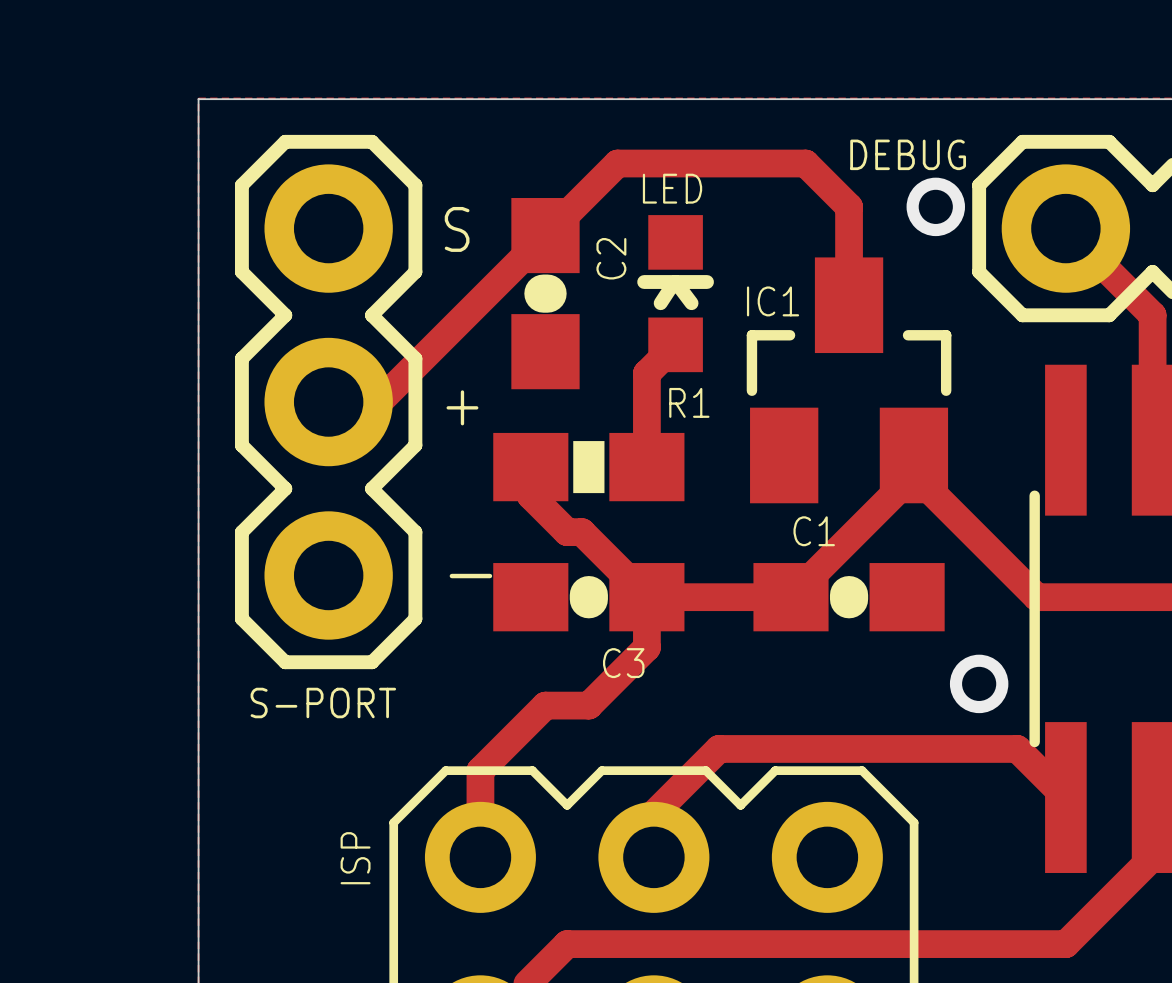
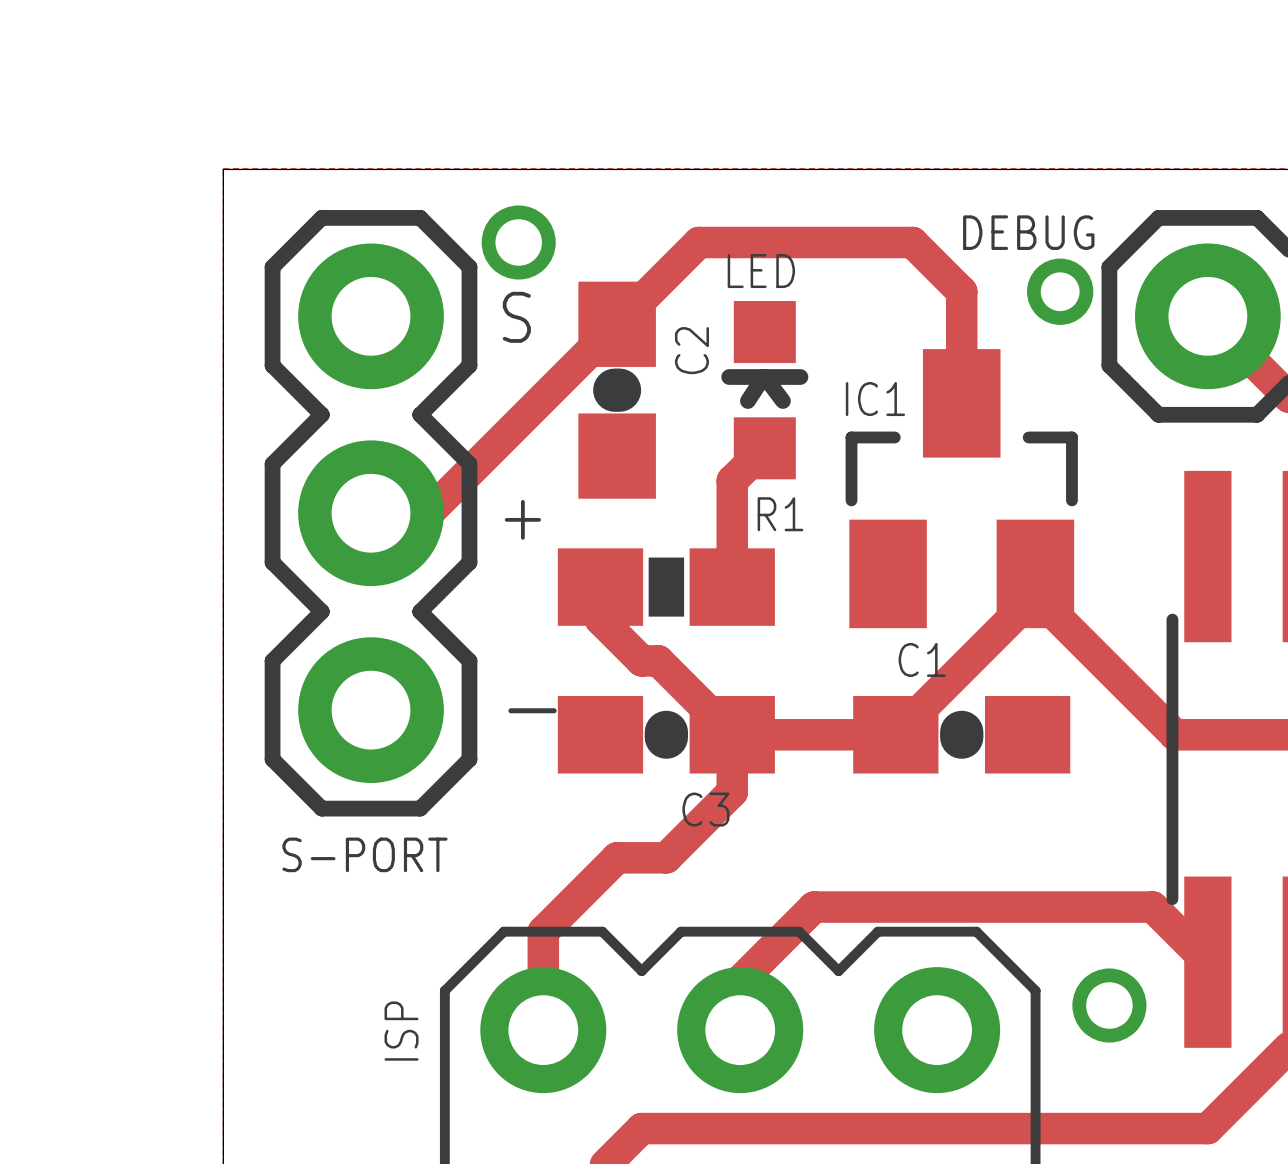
via: none -> (518, 242)
via: (979, 683) -> none
via: none -> (1109, 1005)

